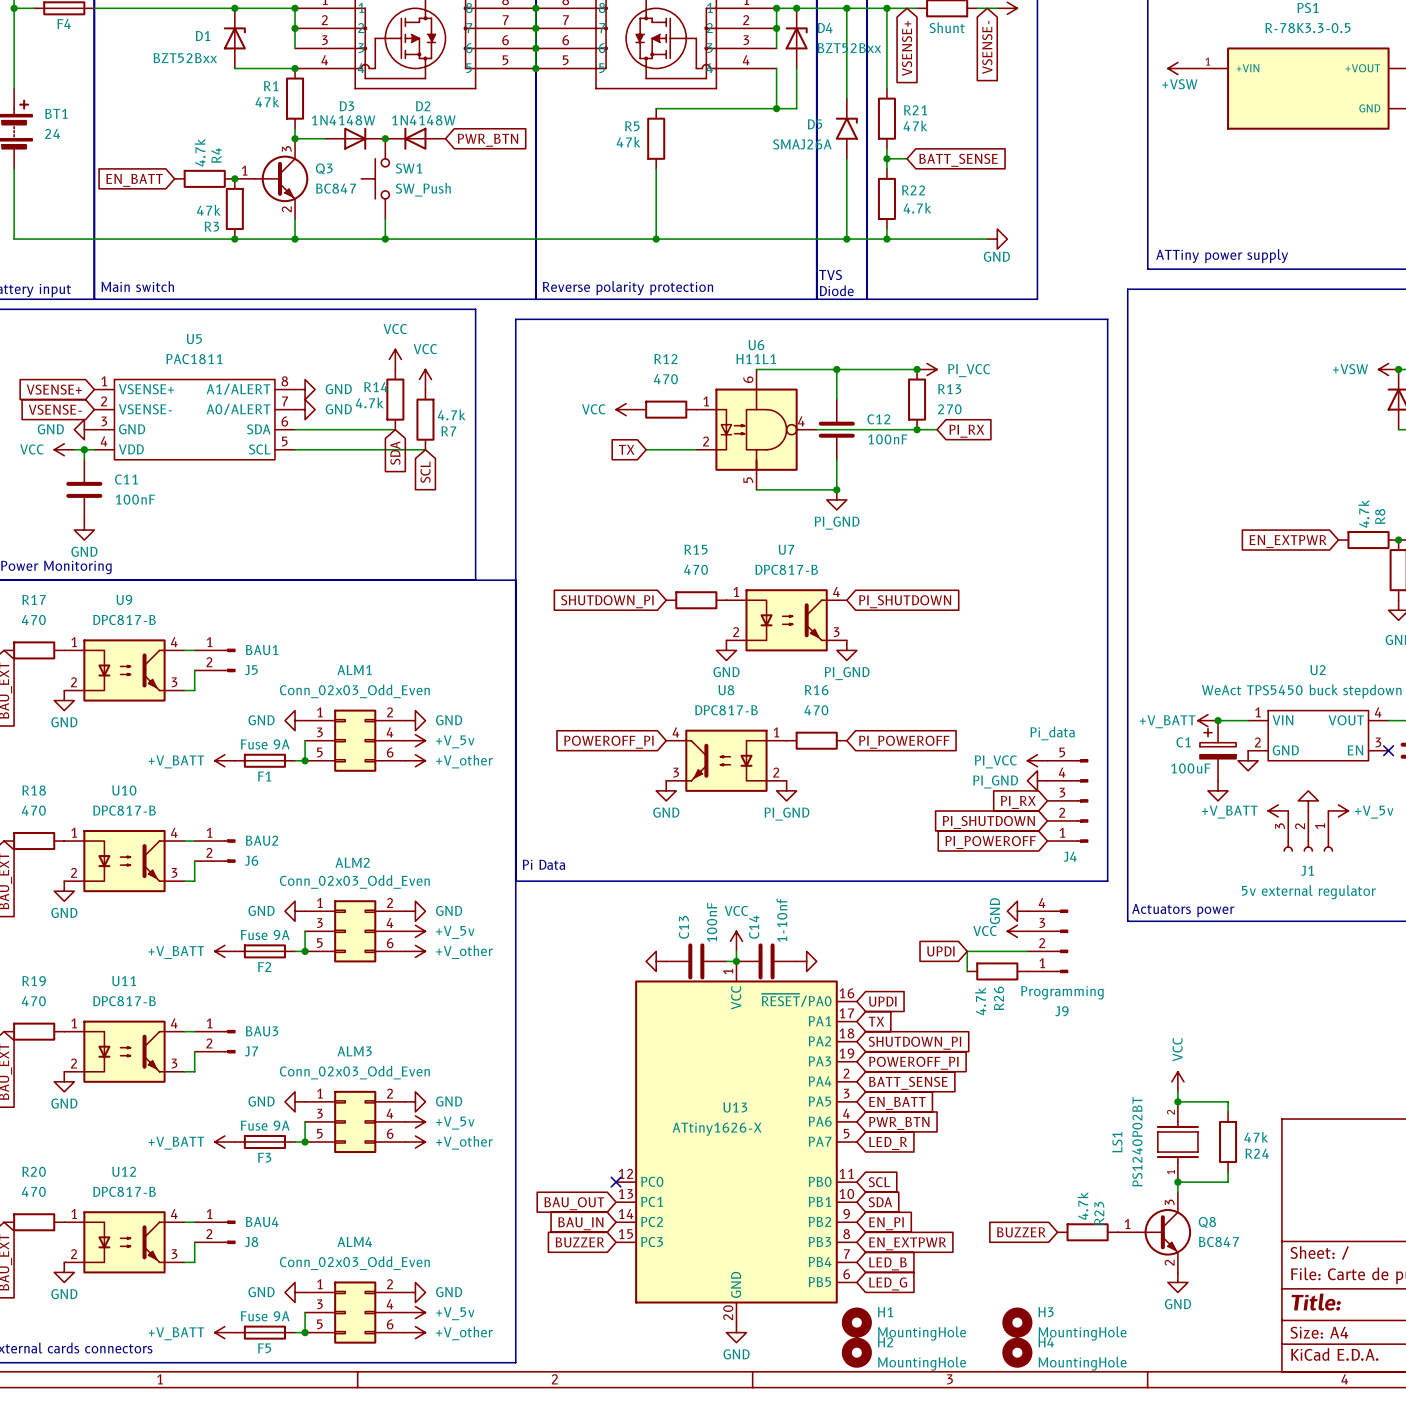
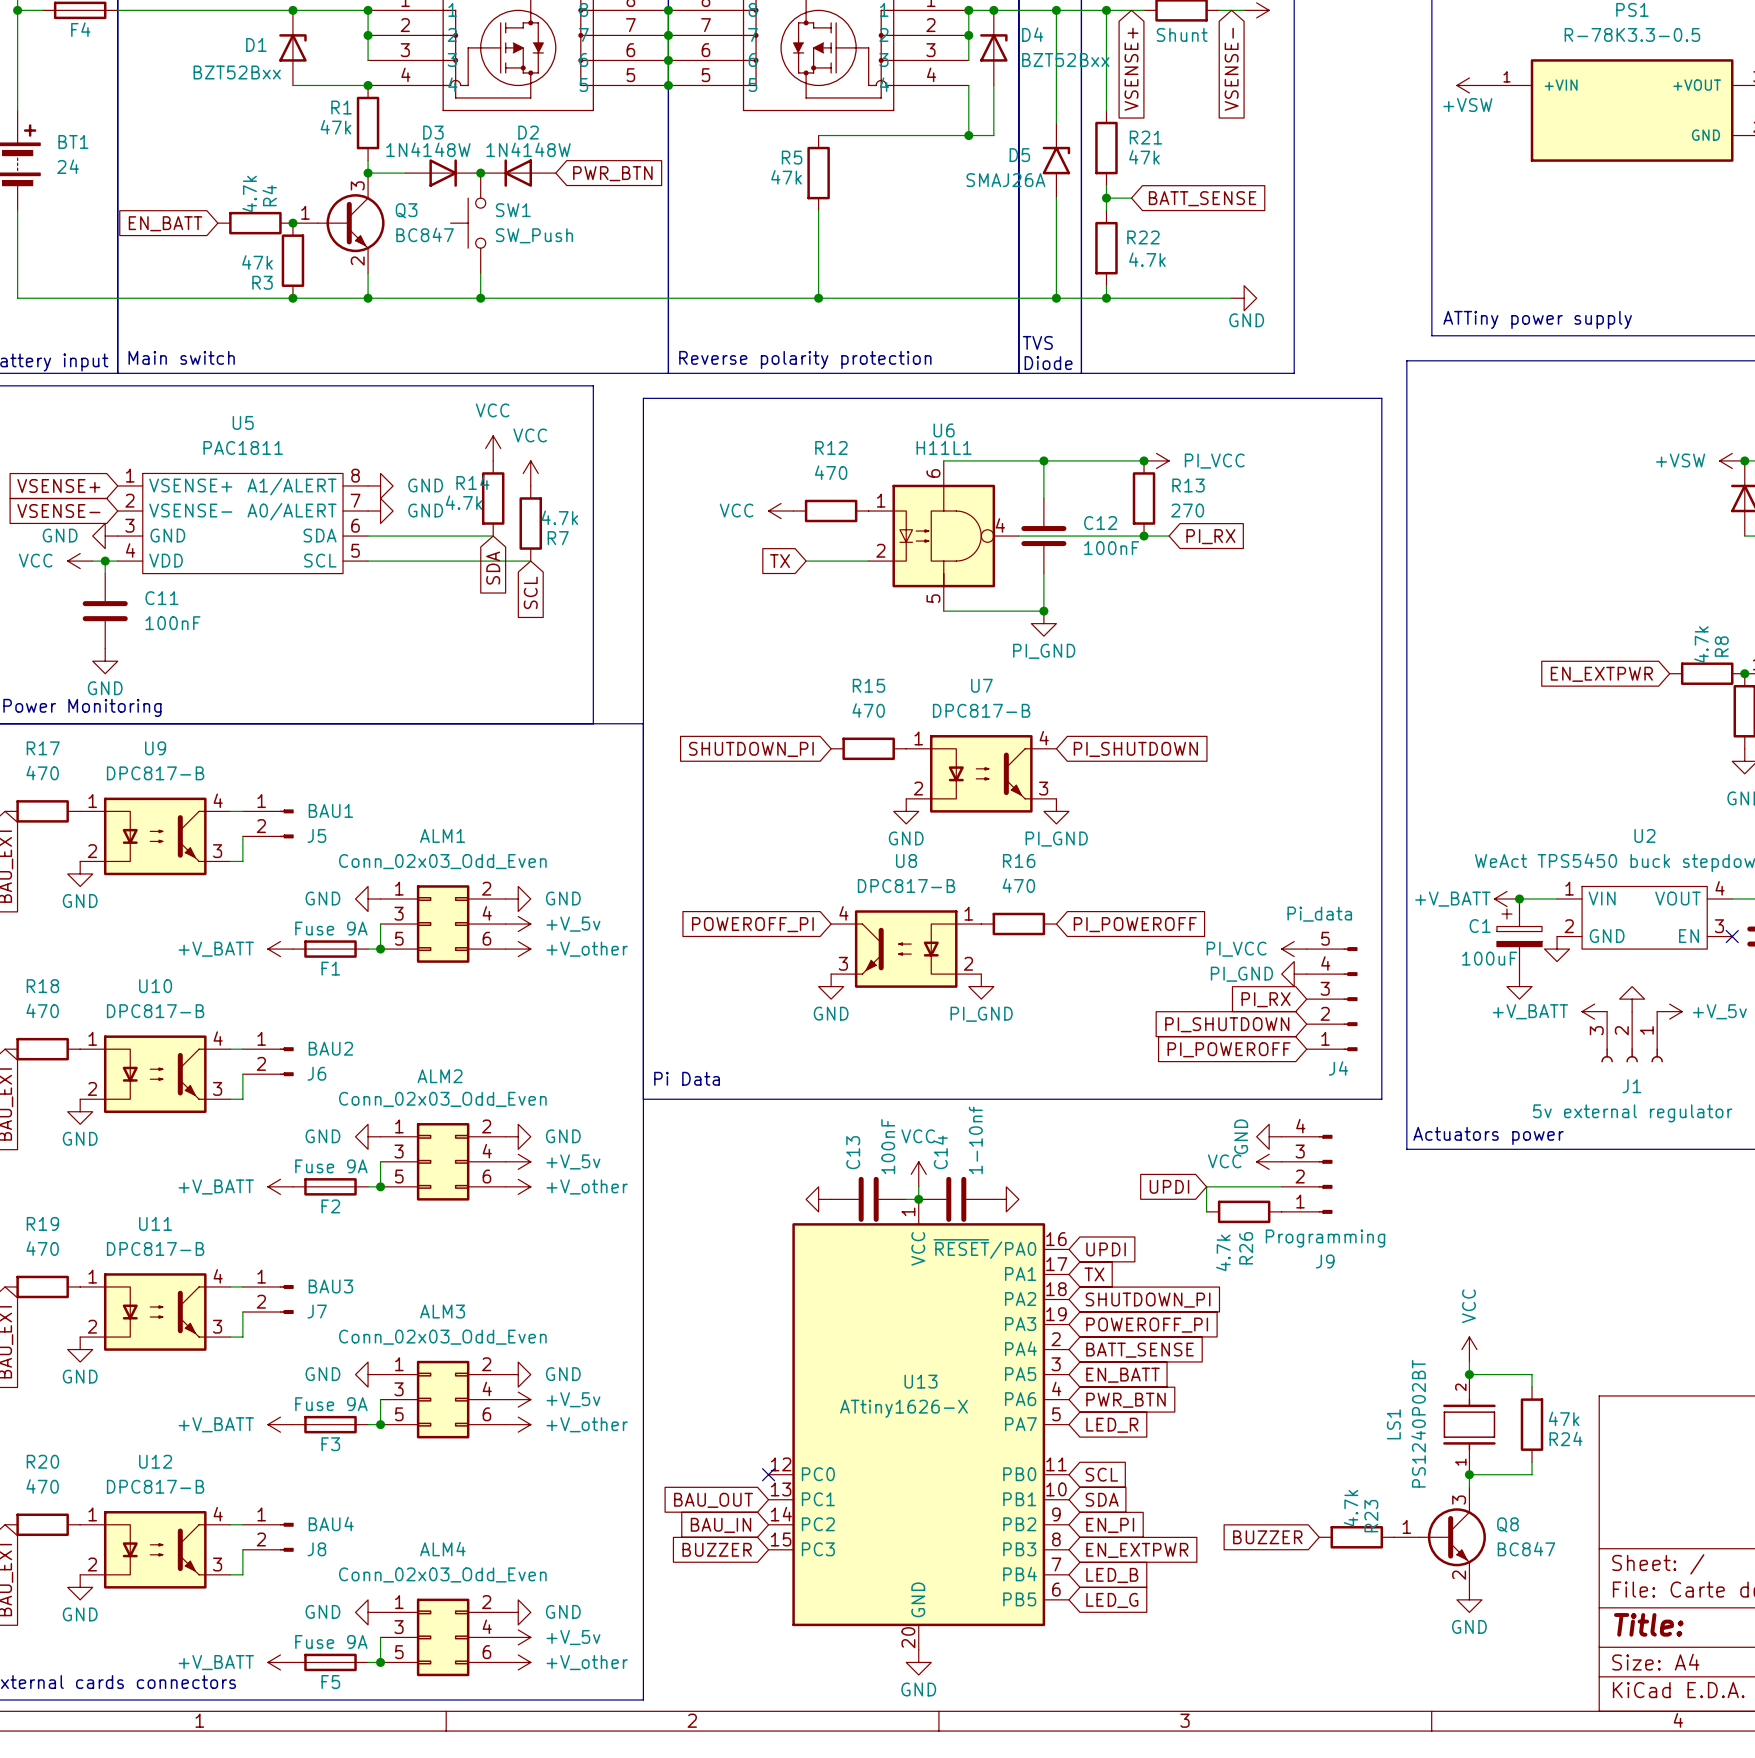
H1: MountingHole (856, 1322) -> none
H3: MountingHole (1017, 1322) -> none
H2: MountingHole (856, 1352) -> none
H4: MountingHole (1017, 1352) -> none

